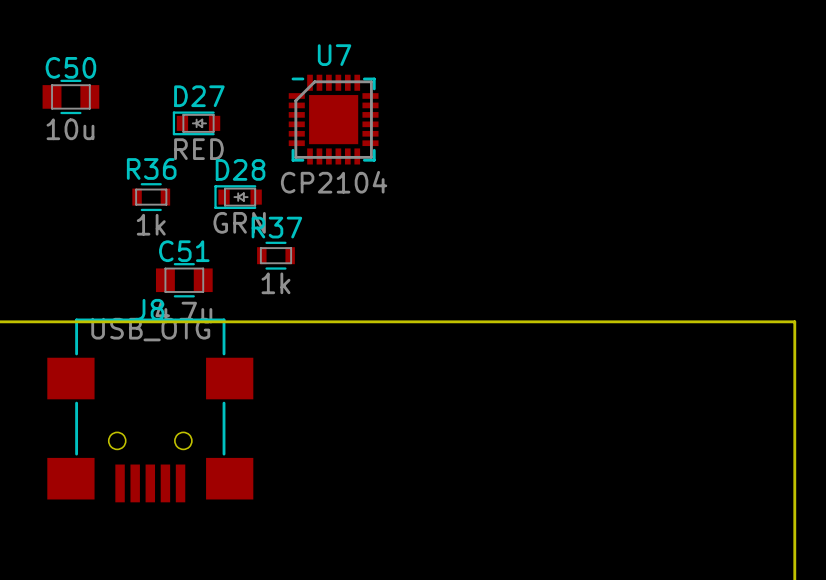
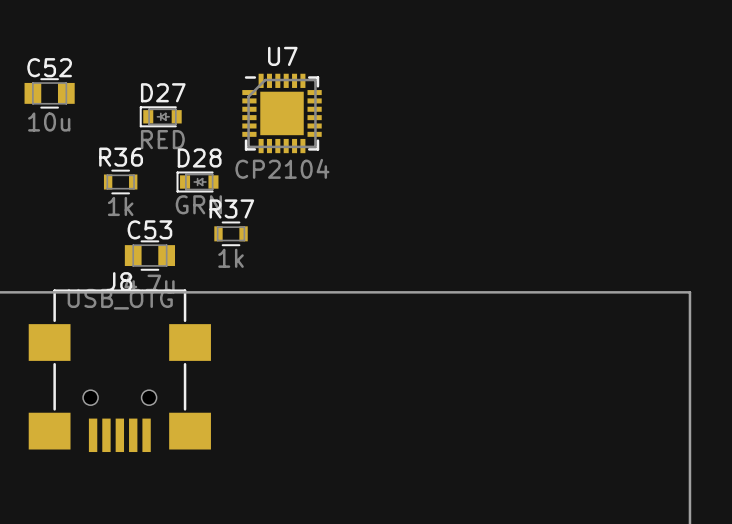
C50 name: C50 (70, 67) -> C52 (49, 67)
C51 name: C51 (184, 251) -> C53 (149, 229)

